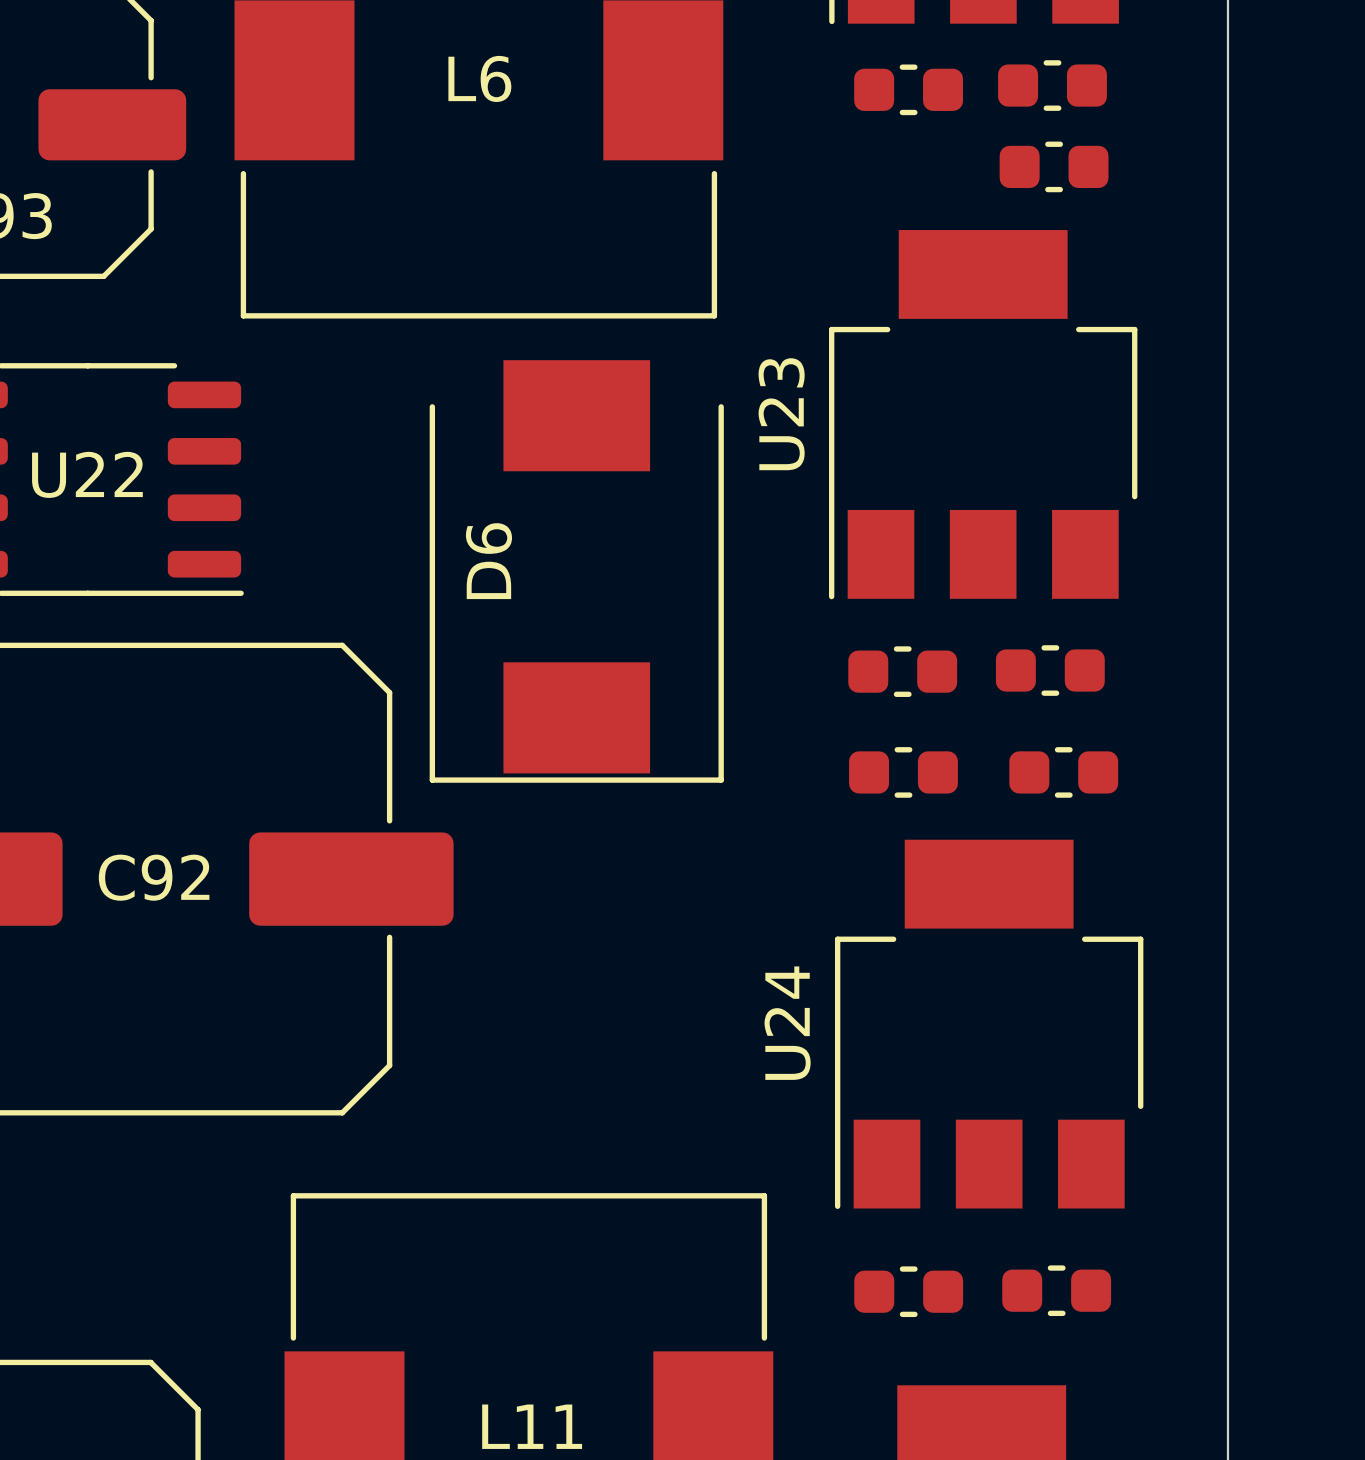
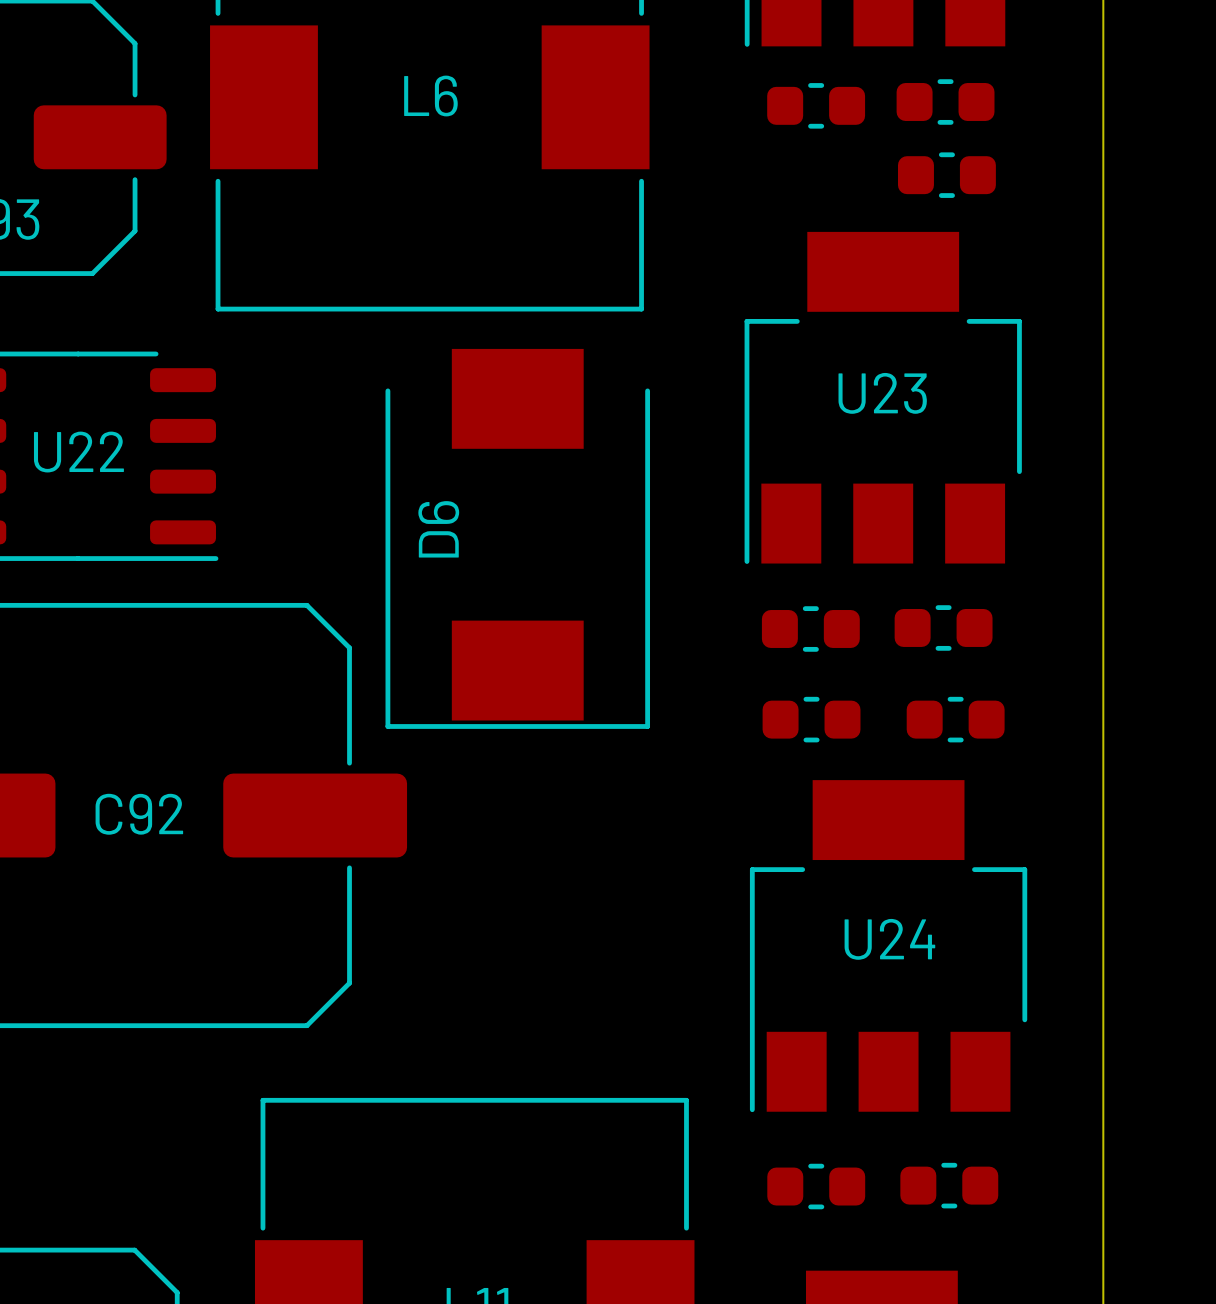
U23 name rotation: 0° (781, 414) -> 90° clockwise (882, 393)
U23 name position: U23 (781, 414) -> U23 (882, 393)
U24 name rotation: 0° (787, 1023) -> 90° clockwise (889, 939)
U24 name position: U24 (787, 1023) -> U24 (889, 939)

